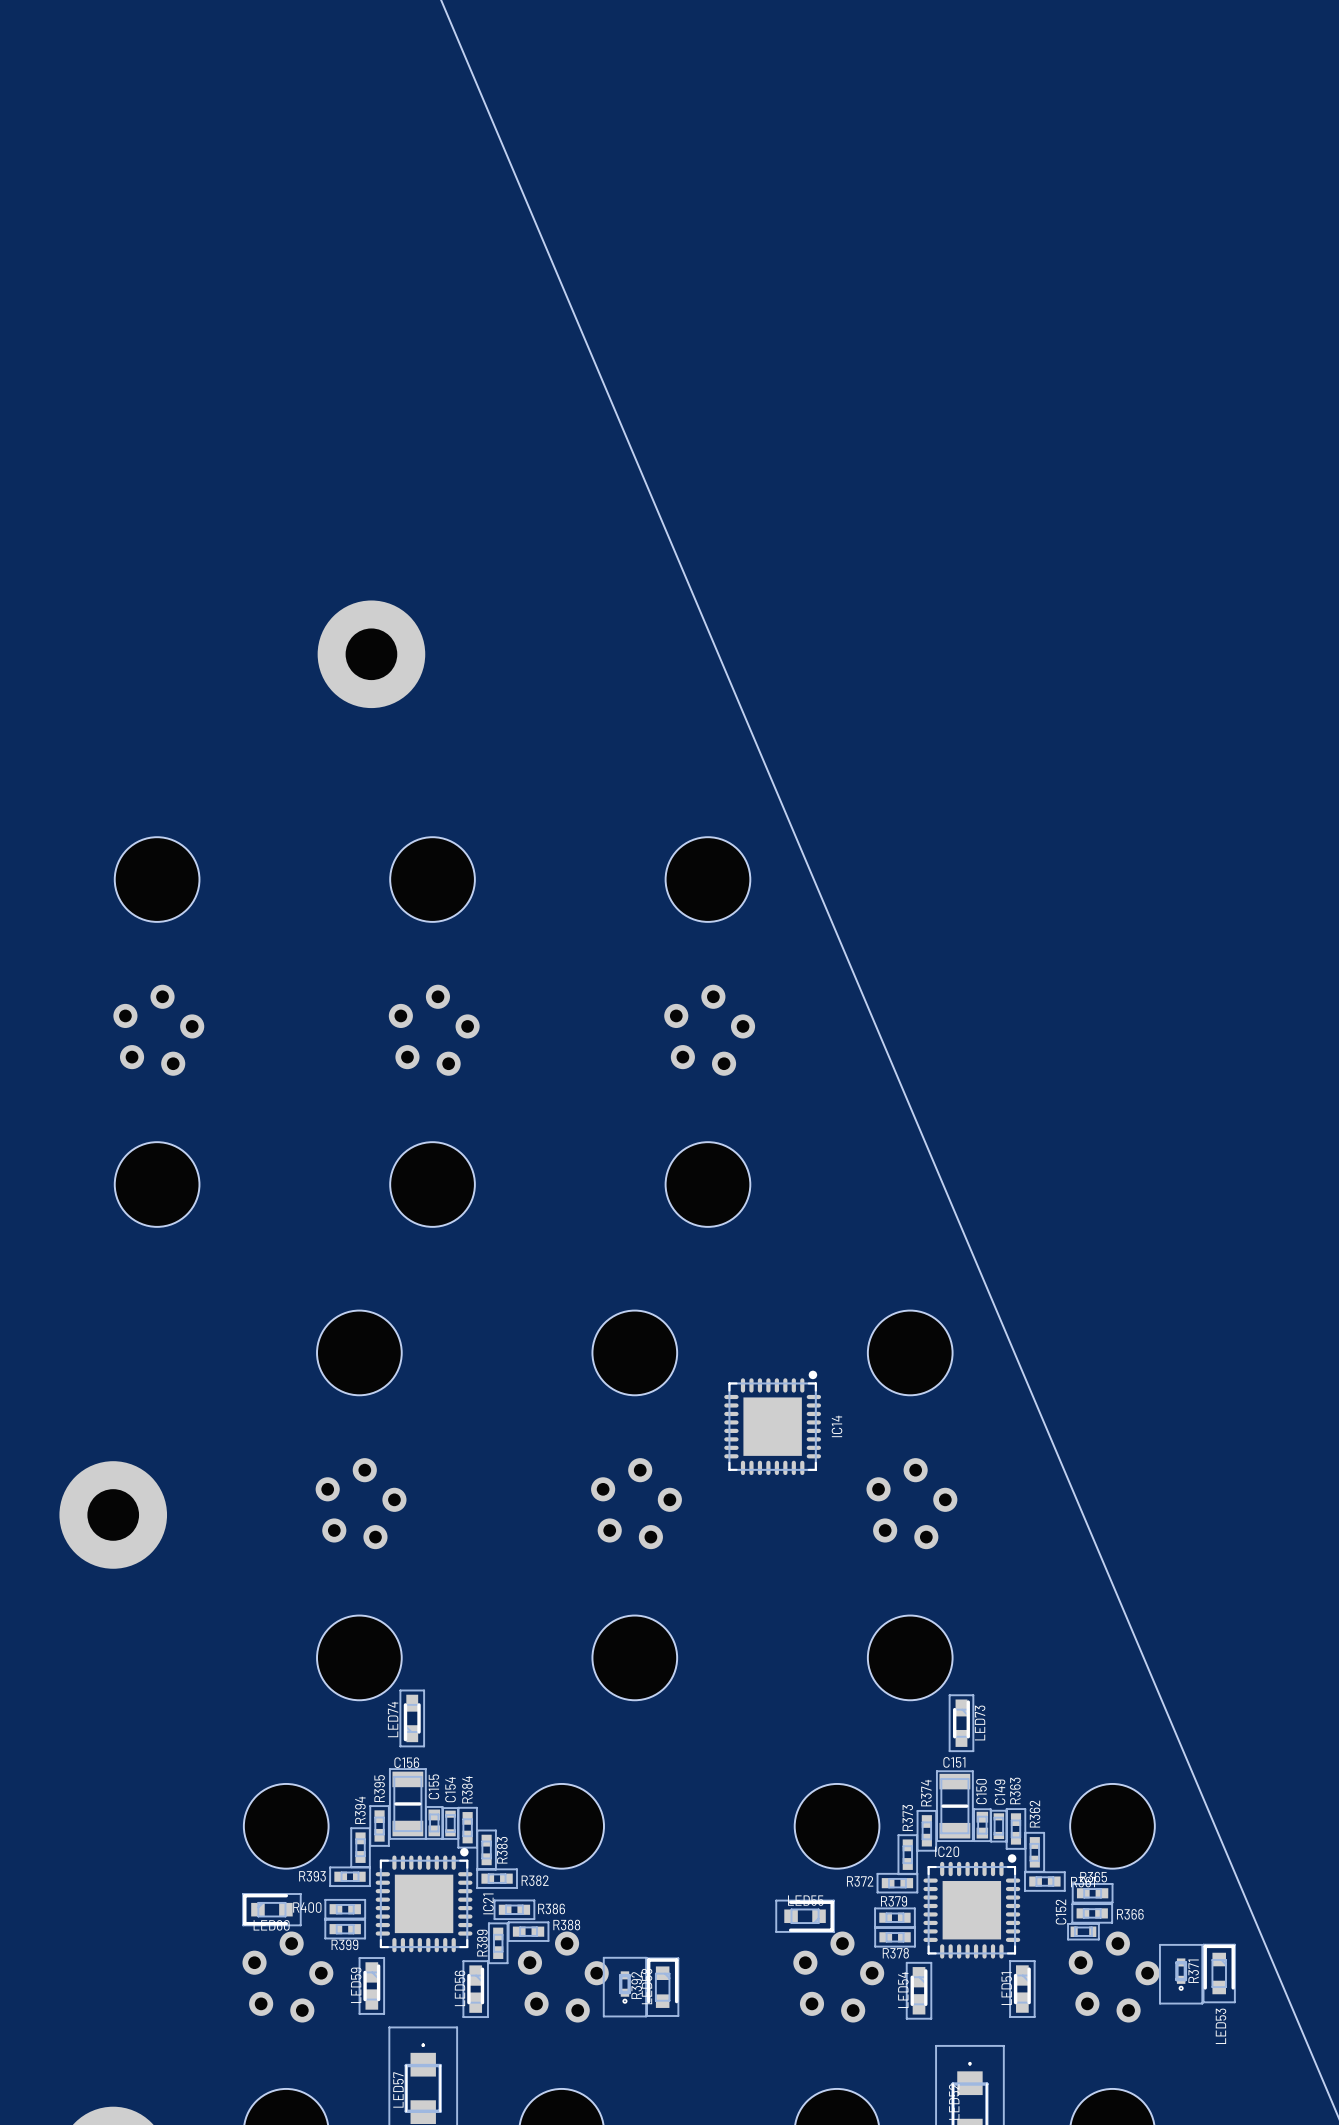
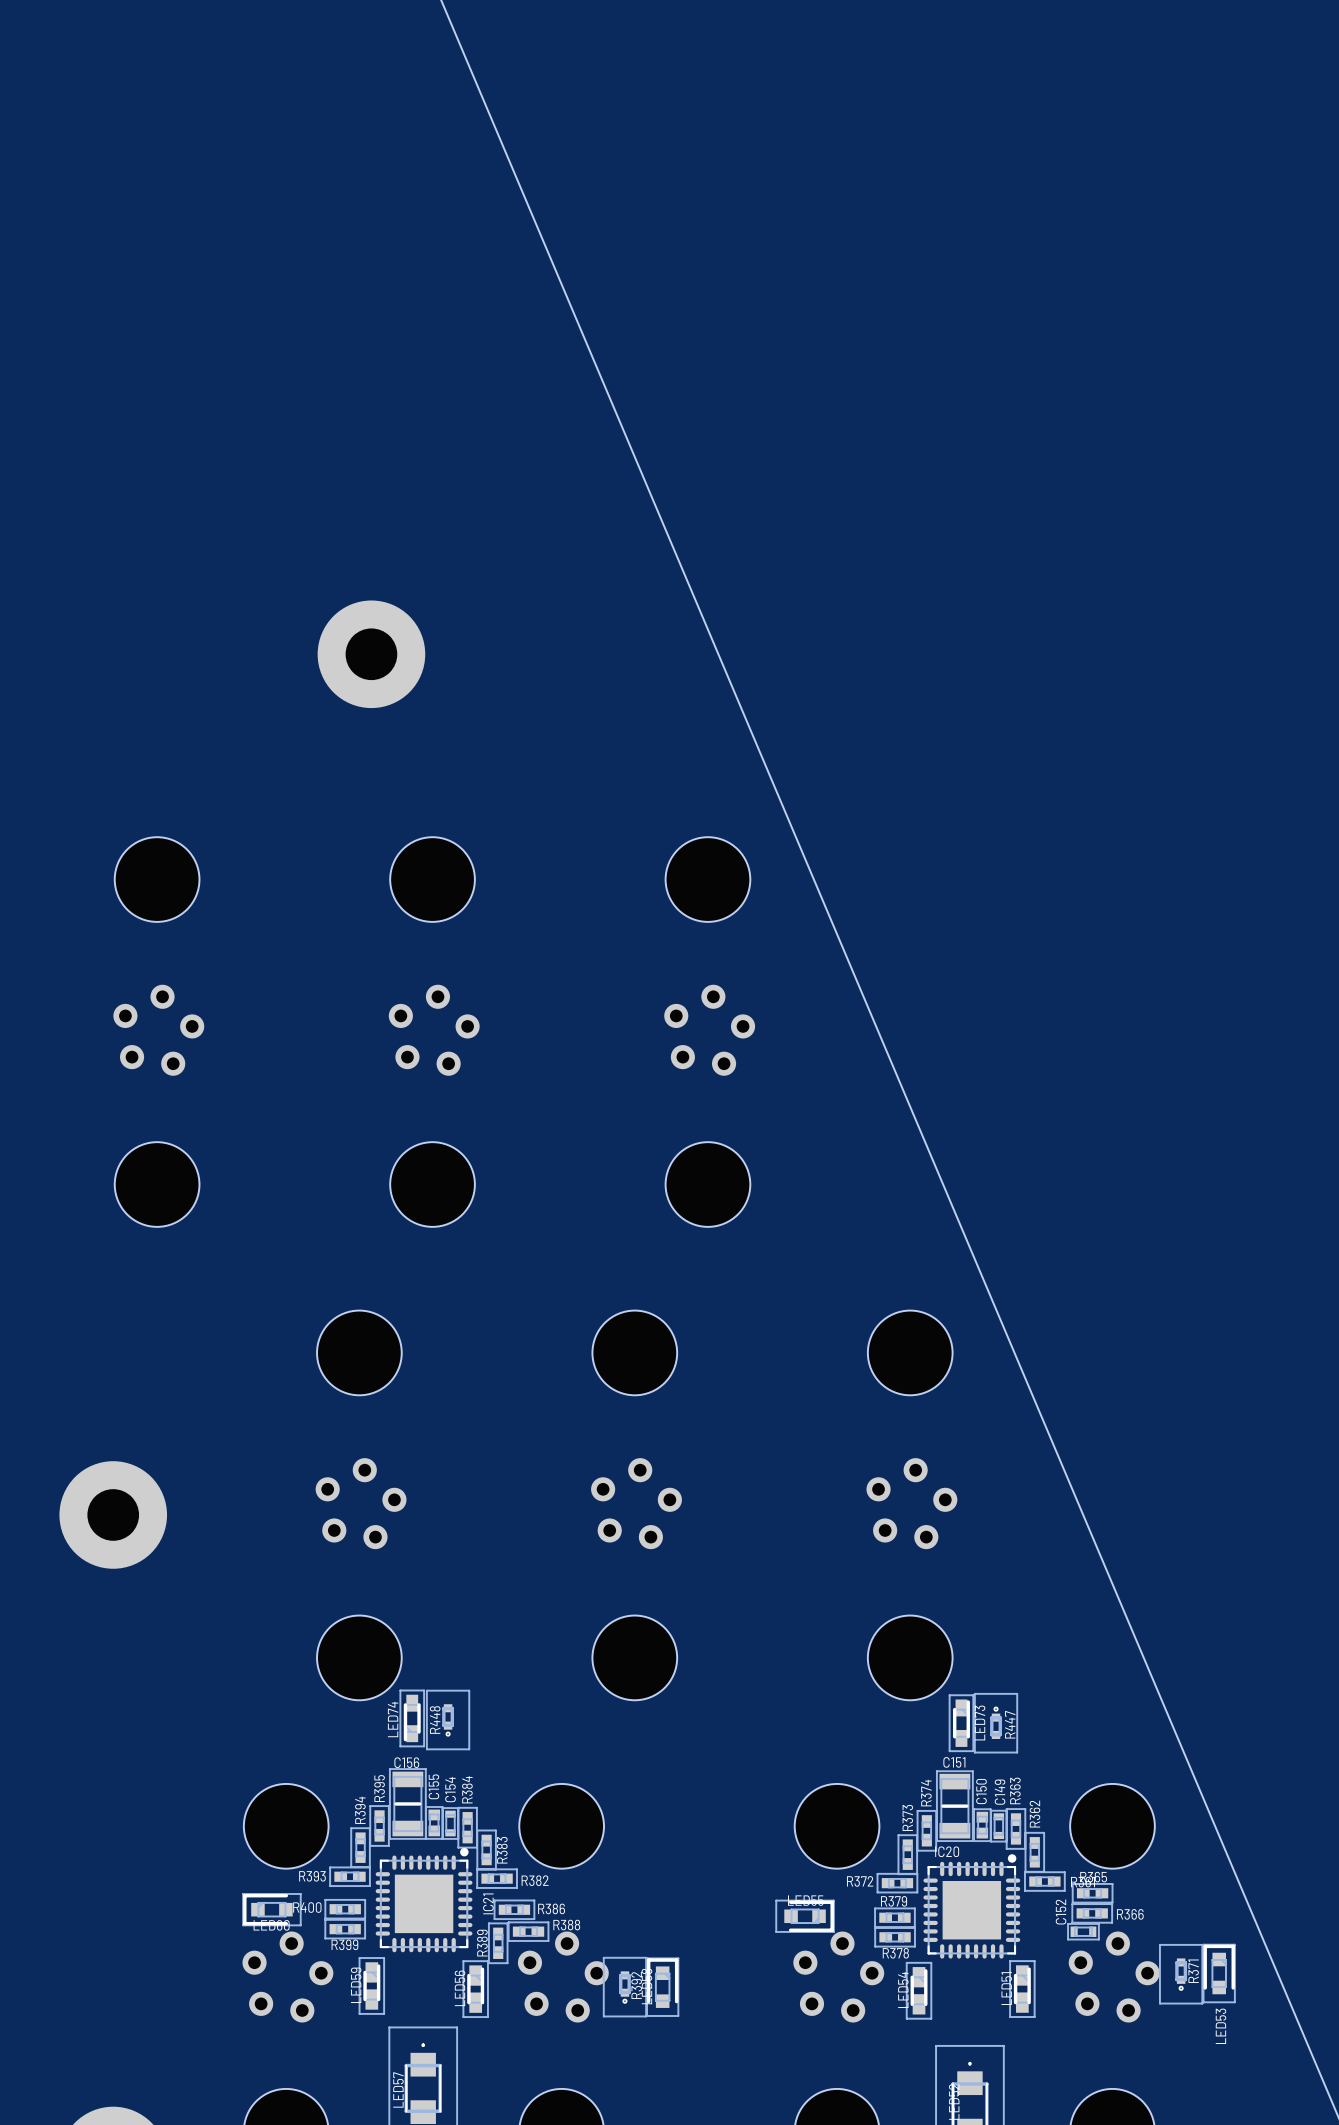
IC14: (772, 1422) -> none
R448: none -> (448, 1720)
R447: none -> (996, 1723)

